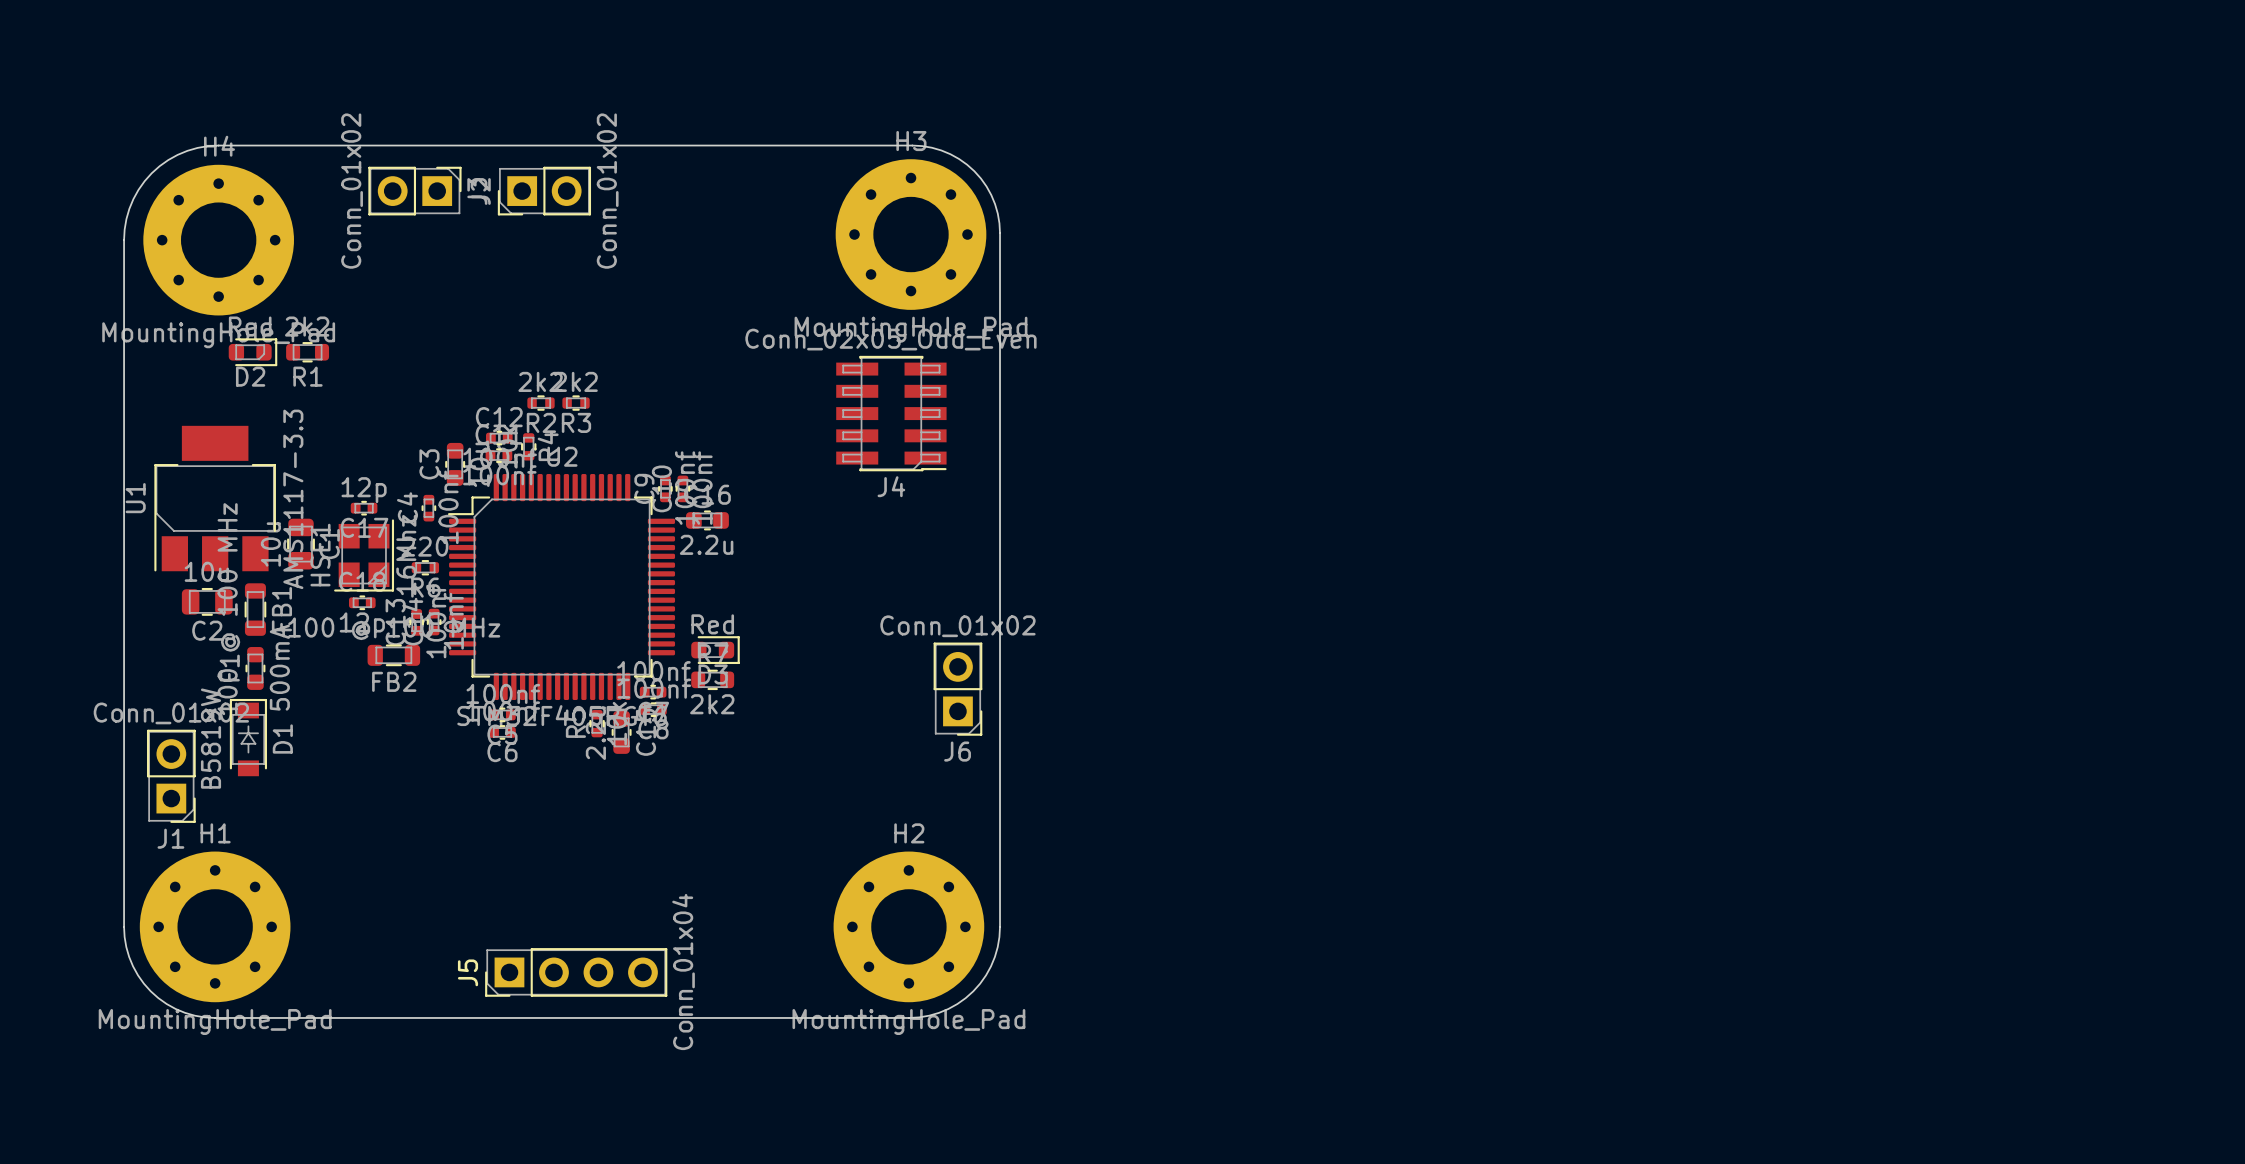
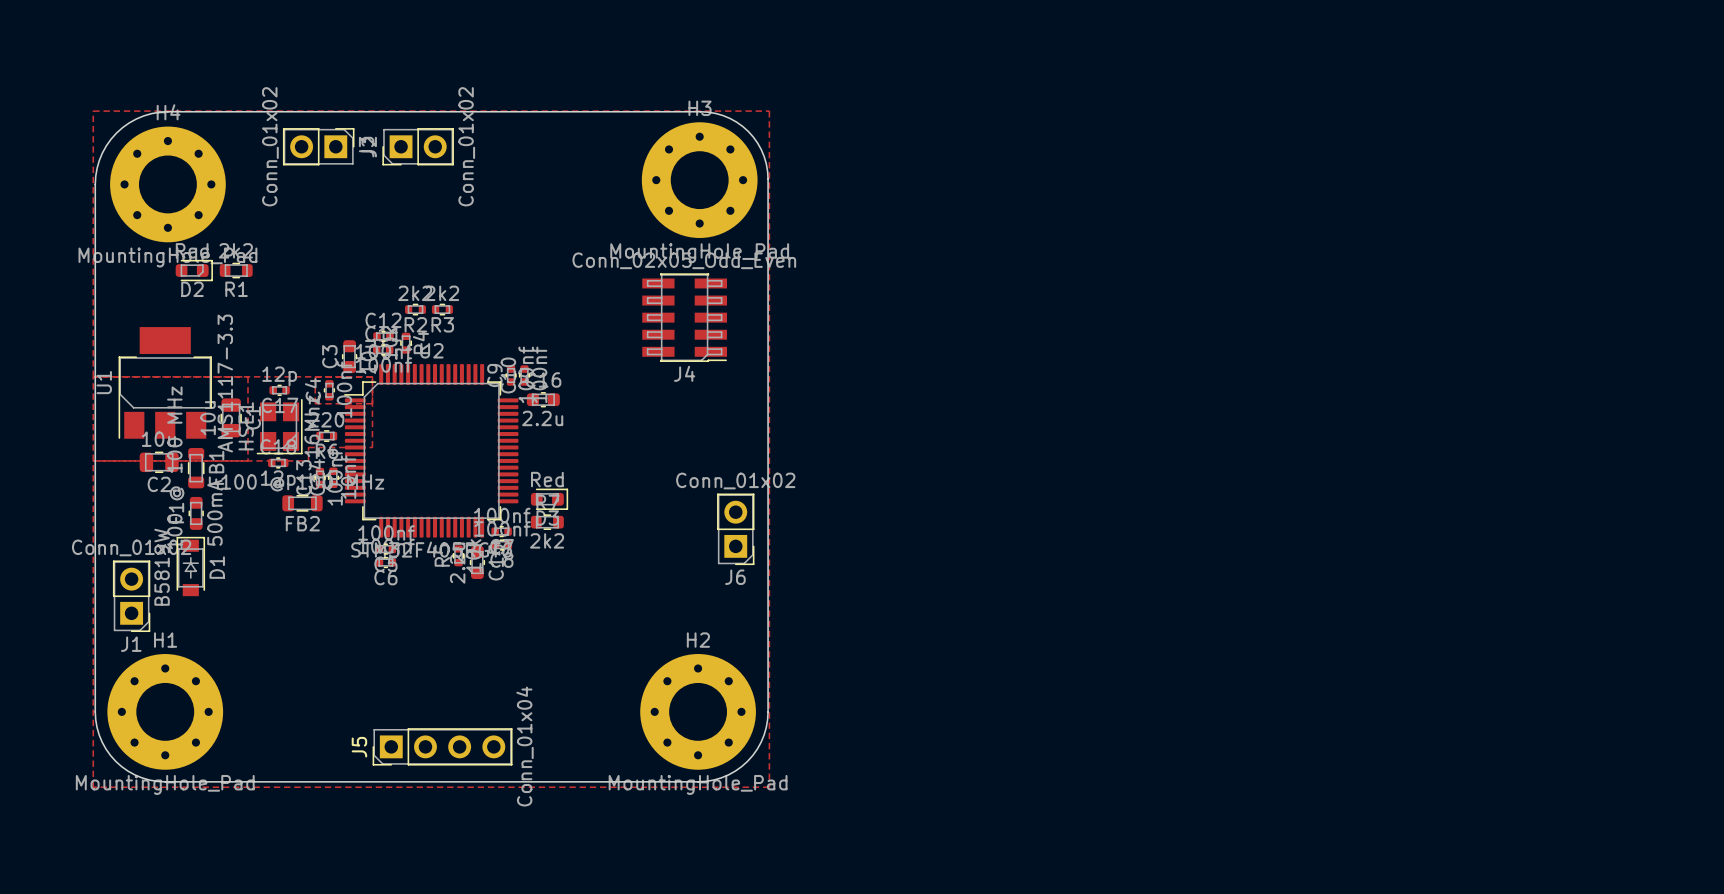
top zone outline: none -> (93, 111) (93, 787) (769, 787) (769, 111) (93, 111)
top zone outline: none -> (93, 376) (372, 376) (372, 447) (308, 447) (308, 460) (93, 460)
top zone outline: none -> (248, 376) (248, 460)
top zone outline: none -> (315, 376) (315, 403) (372, 403)

